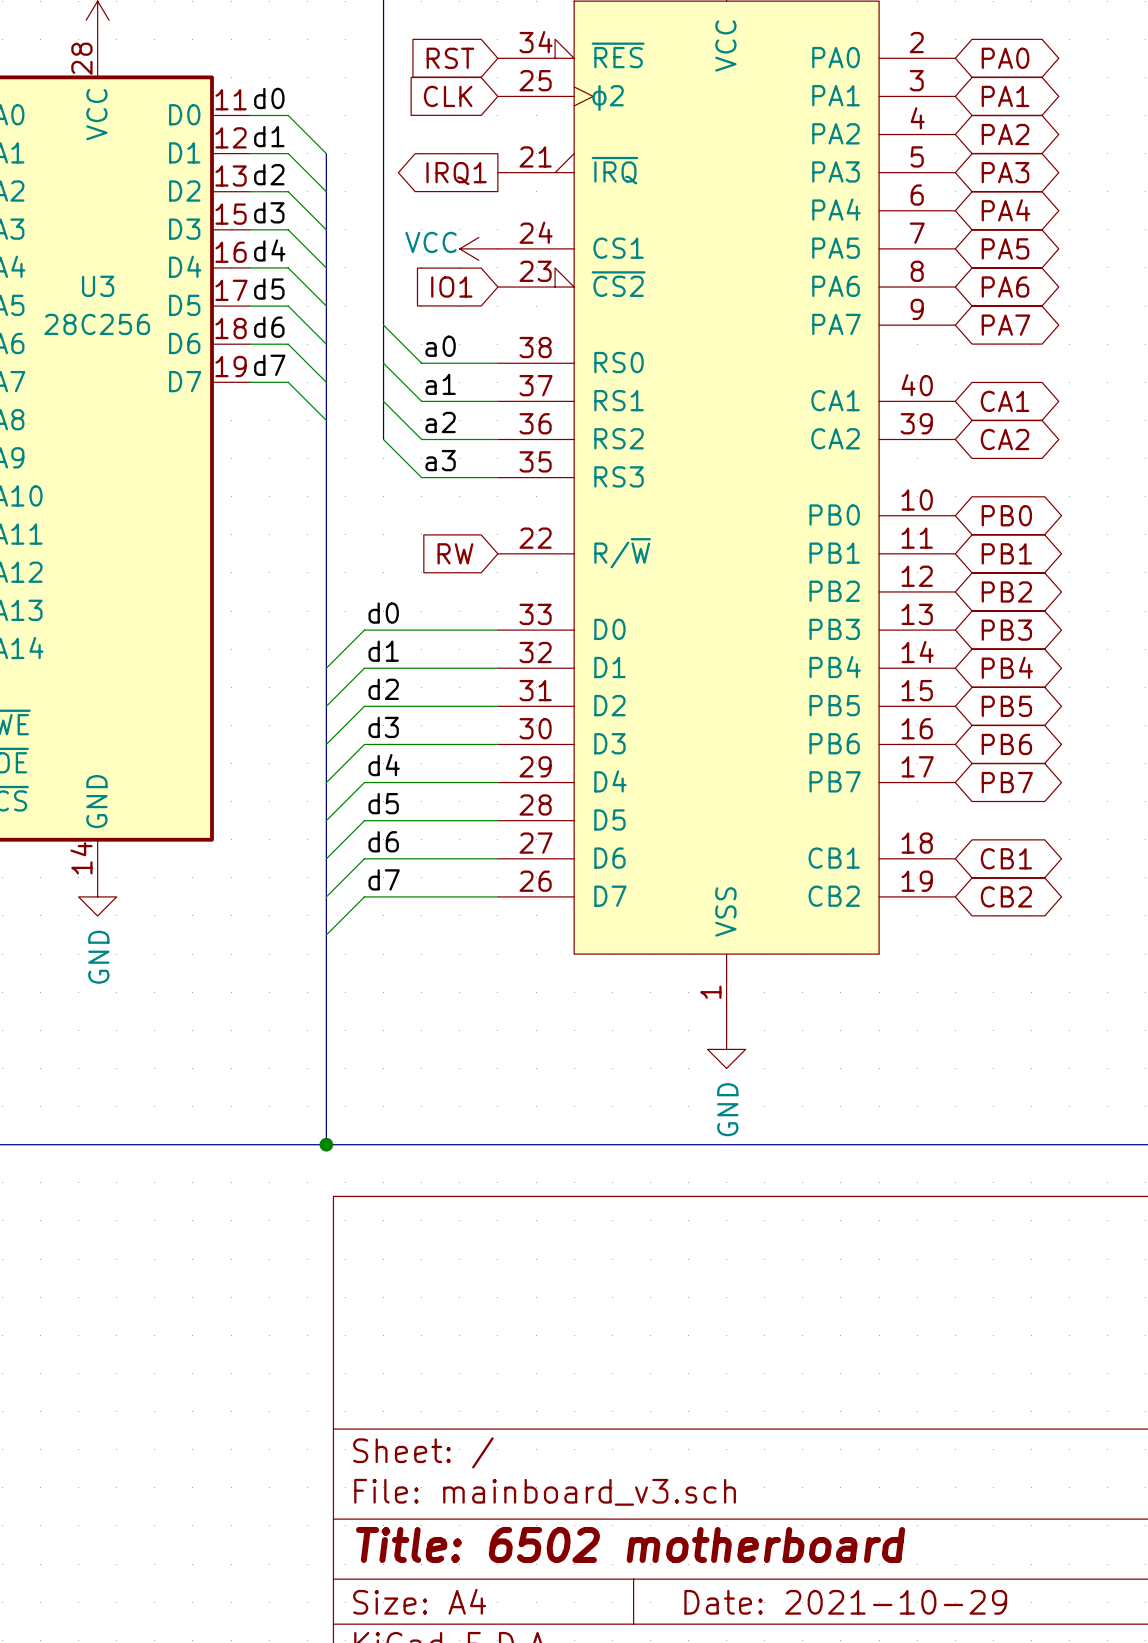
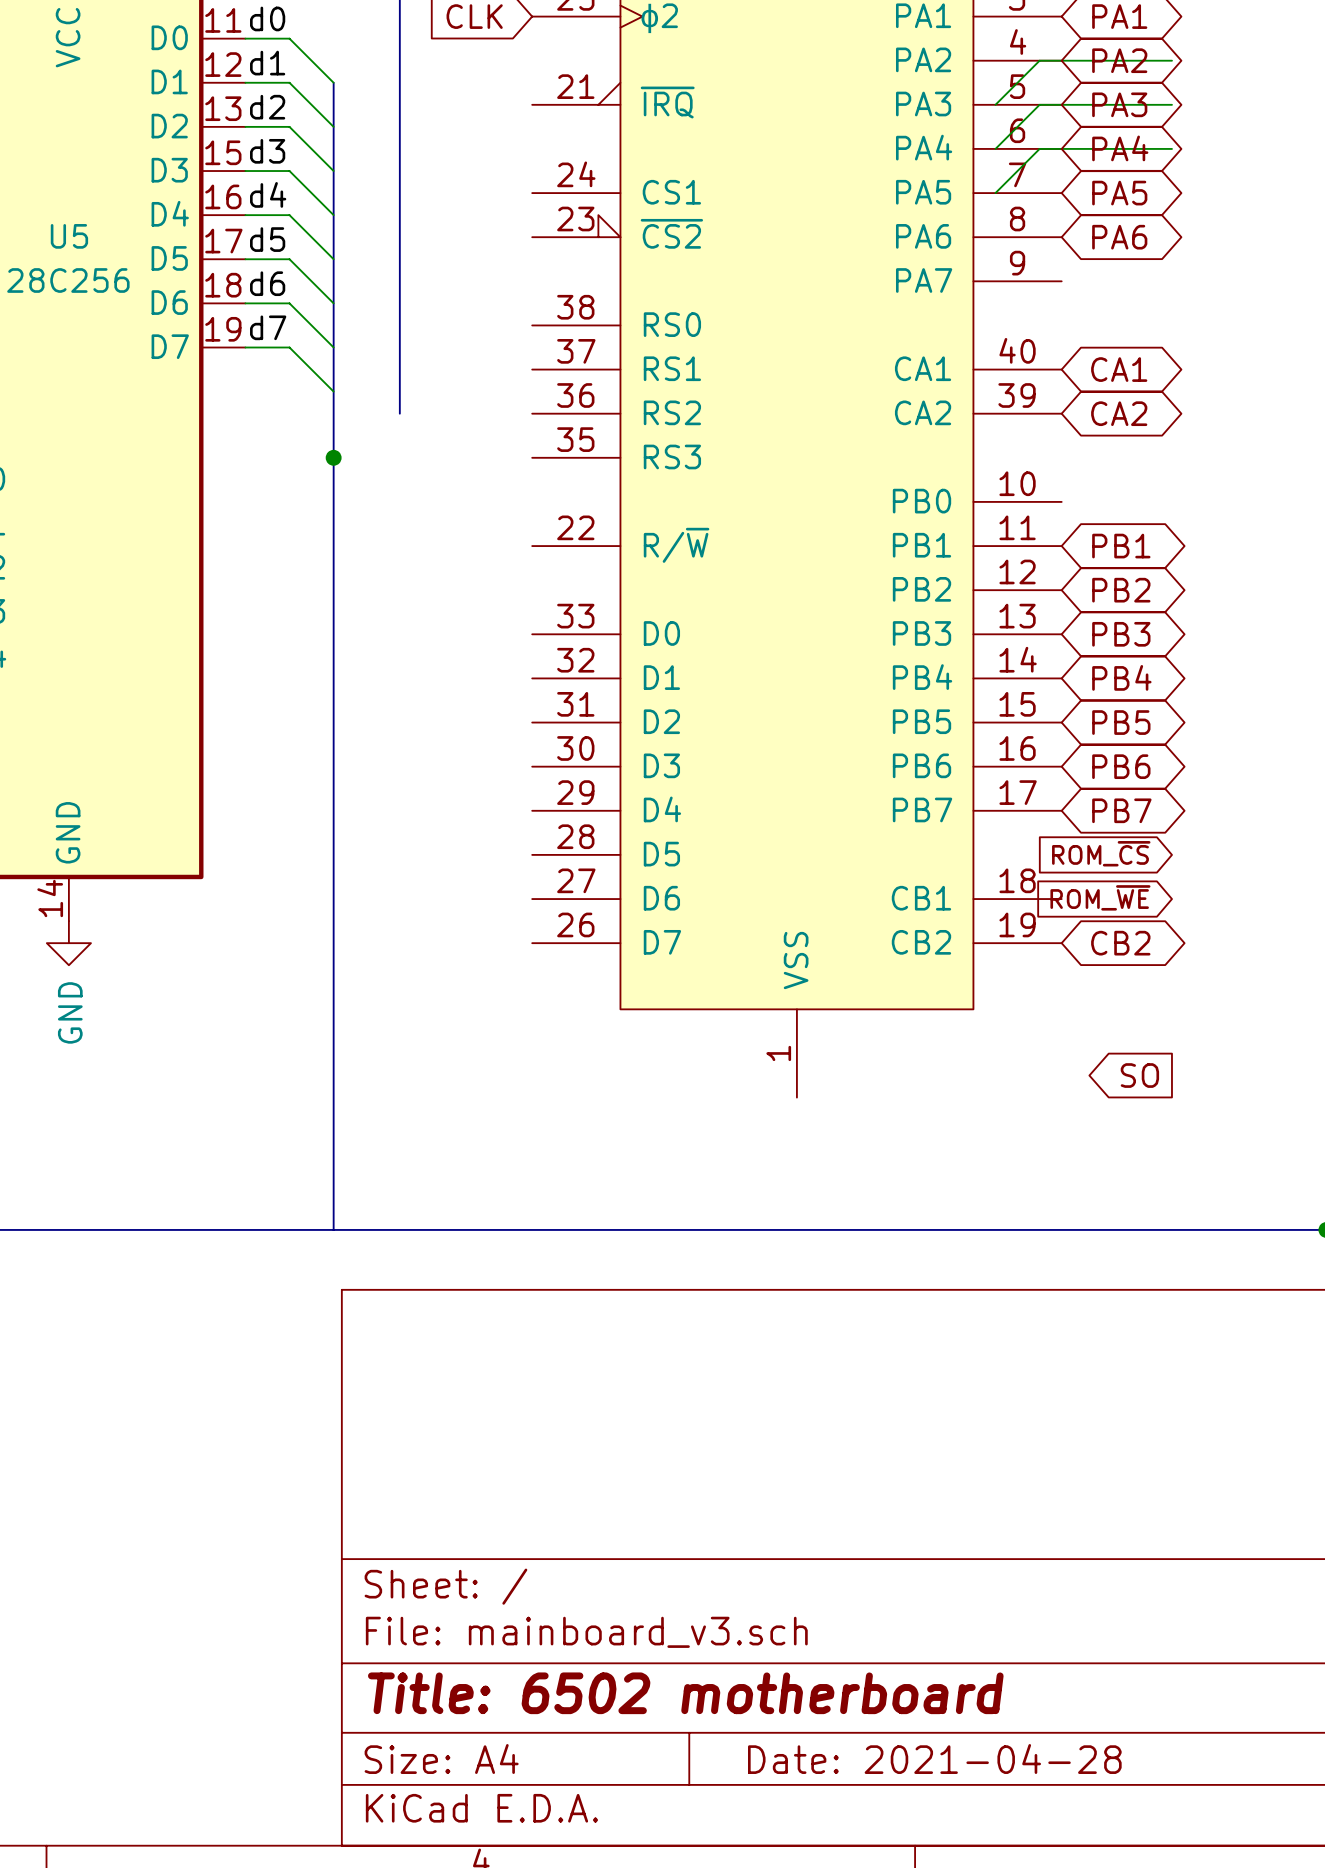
wire: none -> (1171, 60) (1039, 60) (995, 104)
wire: none -> (1171, 104) (1039, 104) (995, 148)
global label: IRQ1 (456, 173) -> none
wire: none -> (1171, 148) (1039, 148) (995, 193)
power symbol: VCC (478, 248) -> none
U3 name: U3 (98, 286) -> U5 (69, 236)
global label: IO1 (451, 287) -> none
wire: (383, 325) (421, 363) (497, 363) -> none
global label: PA7 (1005, 325) -> none
label: a0 (440, 346) -> none
wire: (383, 363) (421, 401) (497, 401) -> none
label: a1 (440, 384) -> none
wire: (383, 401) (421, 439) (497, 439) -> none
label: a2 (440, 422) -> none
wire: (383, 439) (421, 477) (497, 477) -> none
label: a3 (440, 460) -> none
junction: none -> (333, 457)
global label: PB0 (1006, 515) -> none
global label: RW (455, 553) -> none
label: d0 (383, 613) -> none
wire: (497, 630) (364, 630) (326, 668) -> none
label: d1 (383, 651) -> none
wire: (497, 668) (364, 668) (326, 706) -> none
label: d2 (383, 689) -> none
wire: (497, 706) (364, 706) (326, 744) -> none
label: d3 (383, 727) -> none
wire: (497, 744) (364, 744) (326, 782) -> none
label: d4 (384, 765) -> none
wire: (497, 782) (364, 782) (326, 820) -> none
label: d5 (383, 803) -> none
global label: none -> ROM_~{CS} (1101, 853)
wire: (497, 820) (364, 820) (326, 858) -> none
label: d6 (383, 841) -> none
global label: none -> ROM_~{WE} (1100, 897)
wire: (497, 858) (364, 858) (326, 896) -> none
global label: CB1 (1006, 858) -> none
label: d7 (384, 879) -> none
wire: (497, 896) (364, 896) (326, 935) -> none
global label: none -> SO (1139, 1075)
power symbol: GND (726, 1049) -> none
junction: (326, 1144) -> none
title block: Date: 2021-10-29 (845, 1602) -> Date: 2021-04-28 (934, 1759)

